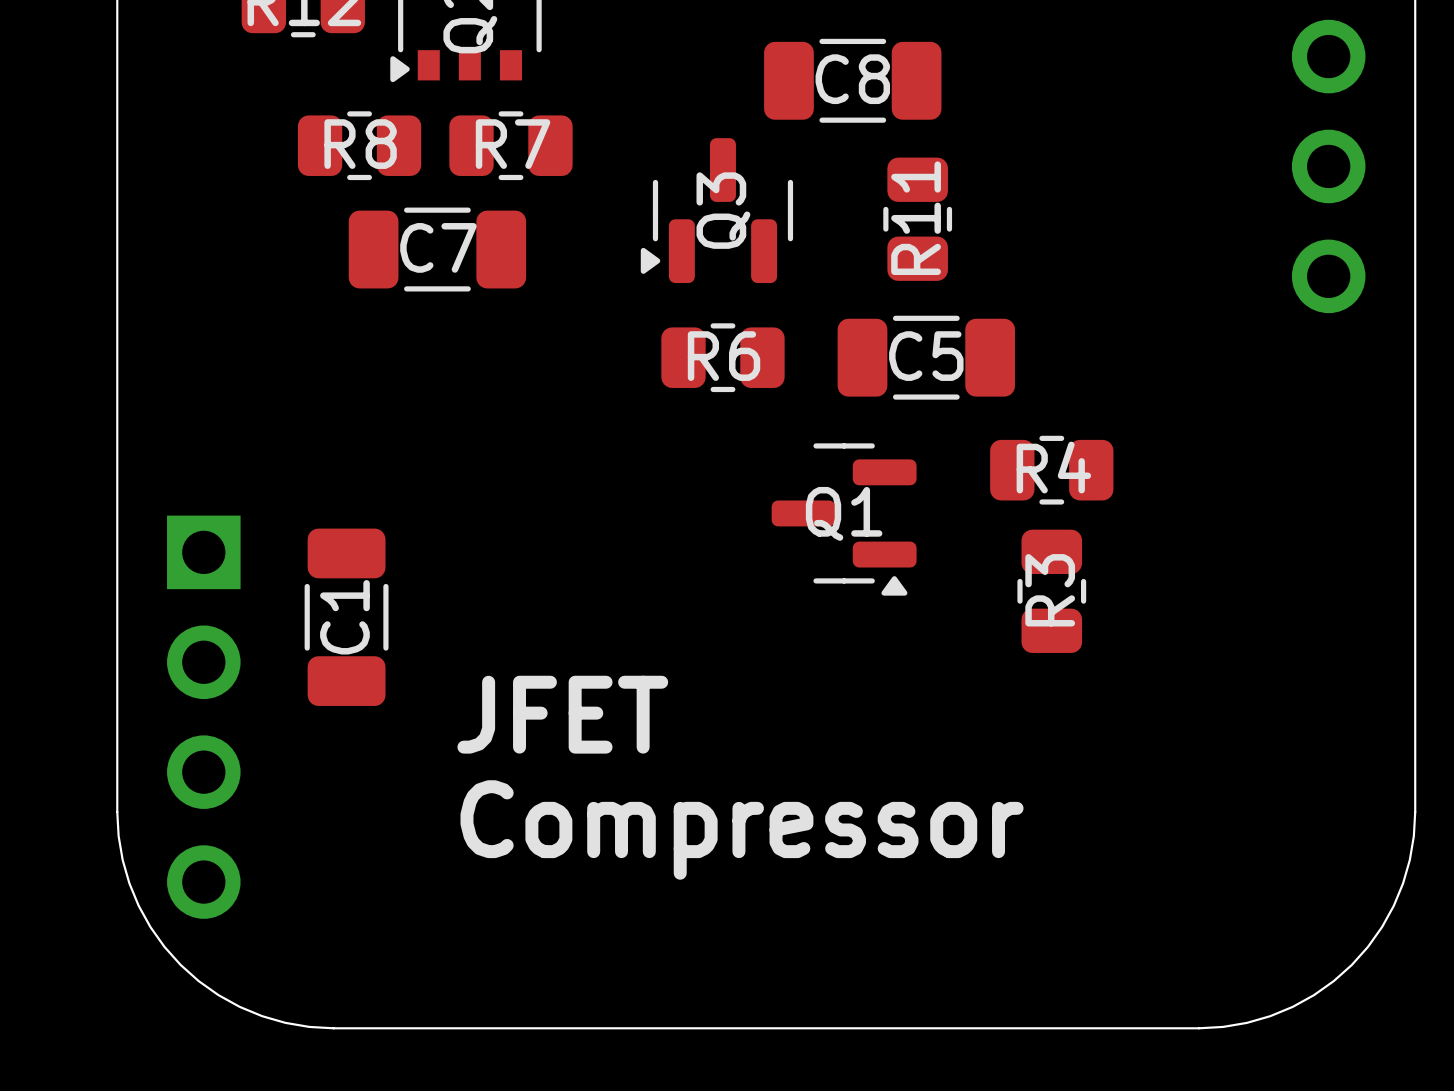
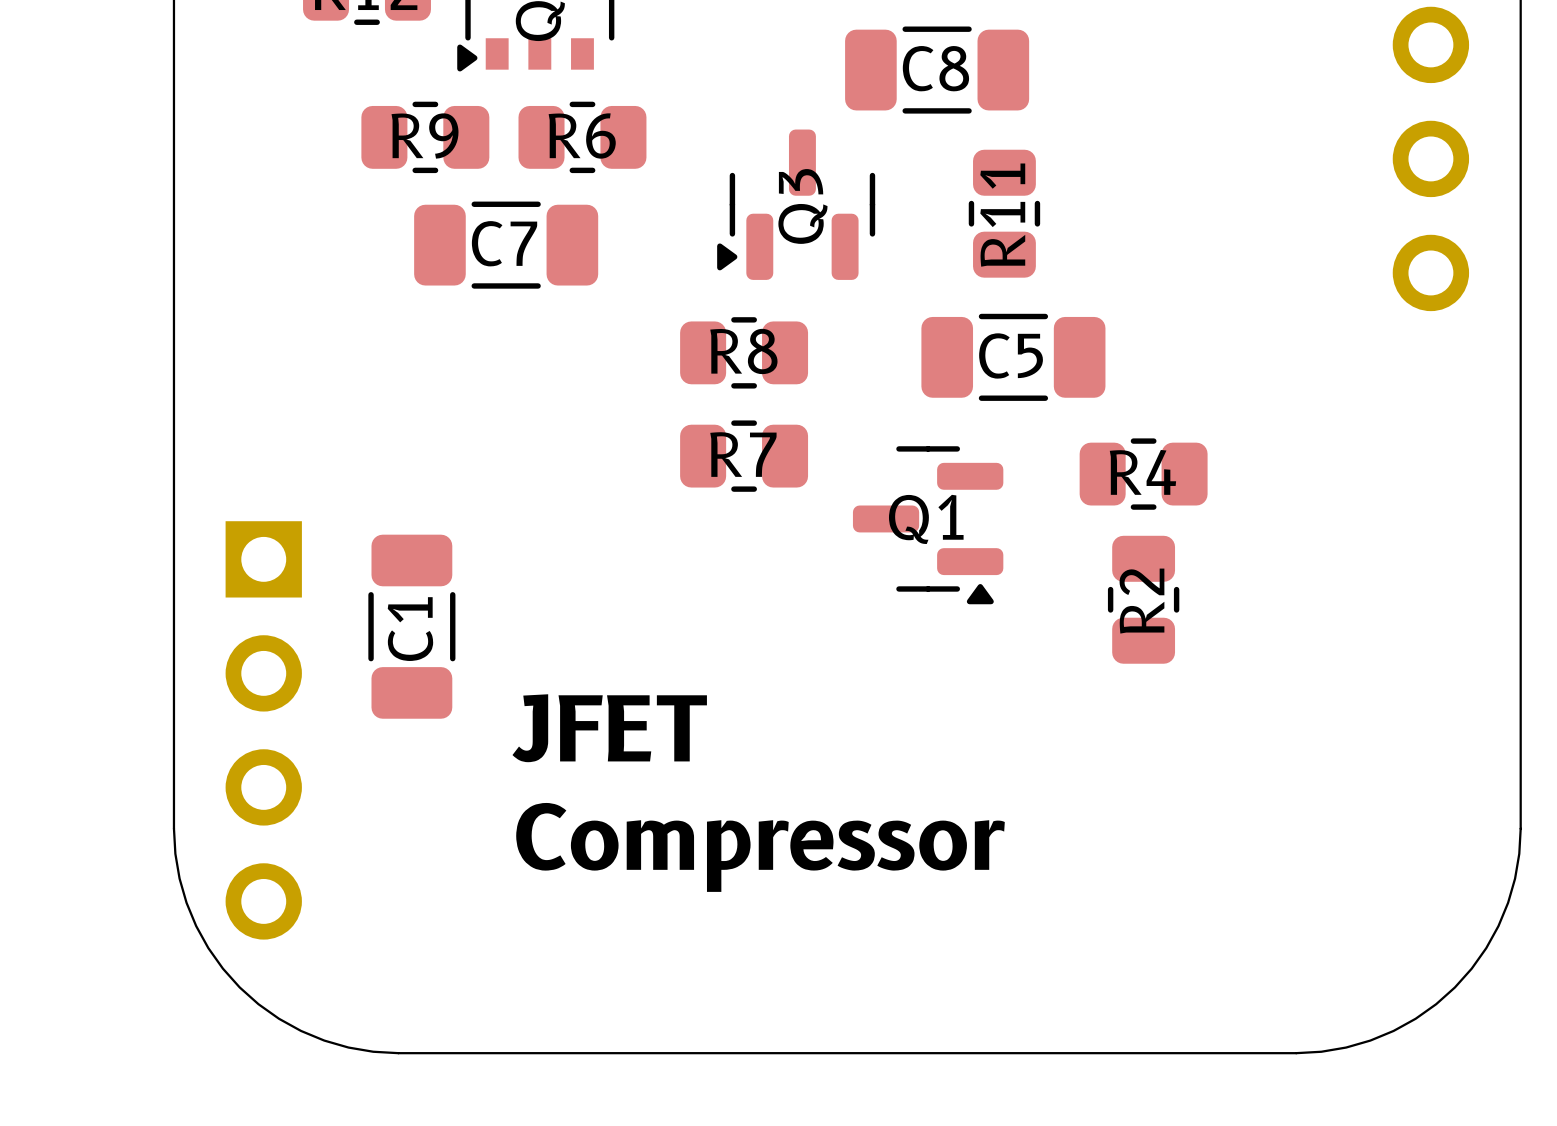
R8 name: R8 (360, 144) -> R9 (425, 136)
R7 name: R7 (513, 144) -> R6 (582, 136)
R8: none -> (744, 352)
R6: (722, 357) -> none
R7: none -> (744, 456)
R3 name: R3 (1050, 590) -> R2 (1141, 601)

